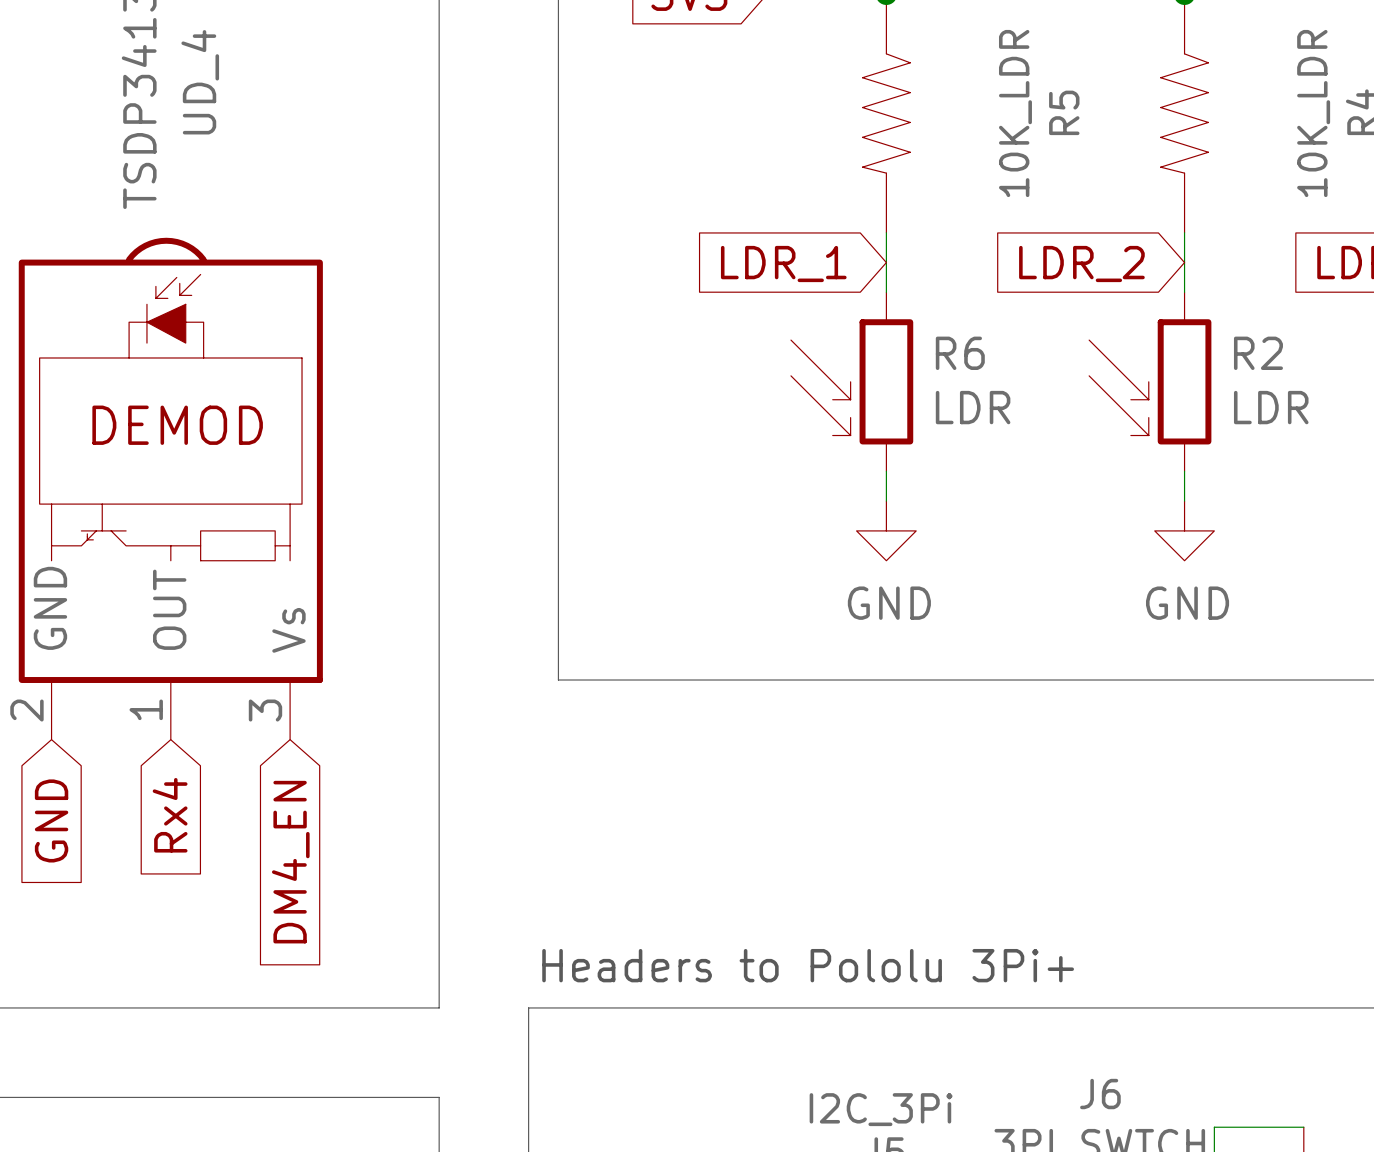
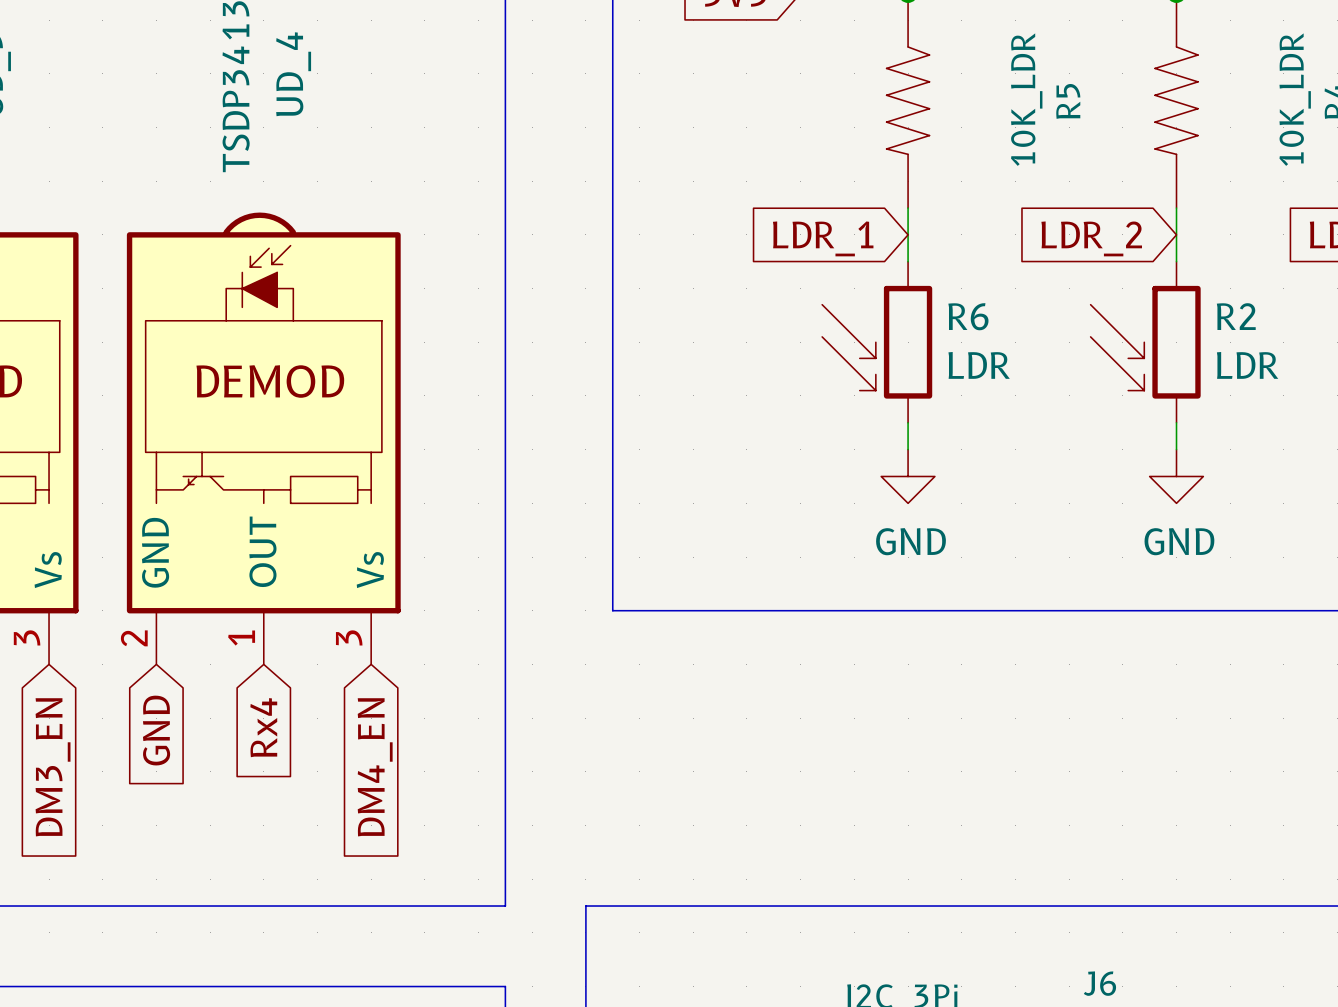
text: Headers to Pololu 3Pi+ (808, 965) -> none

